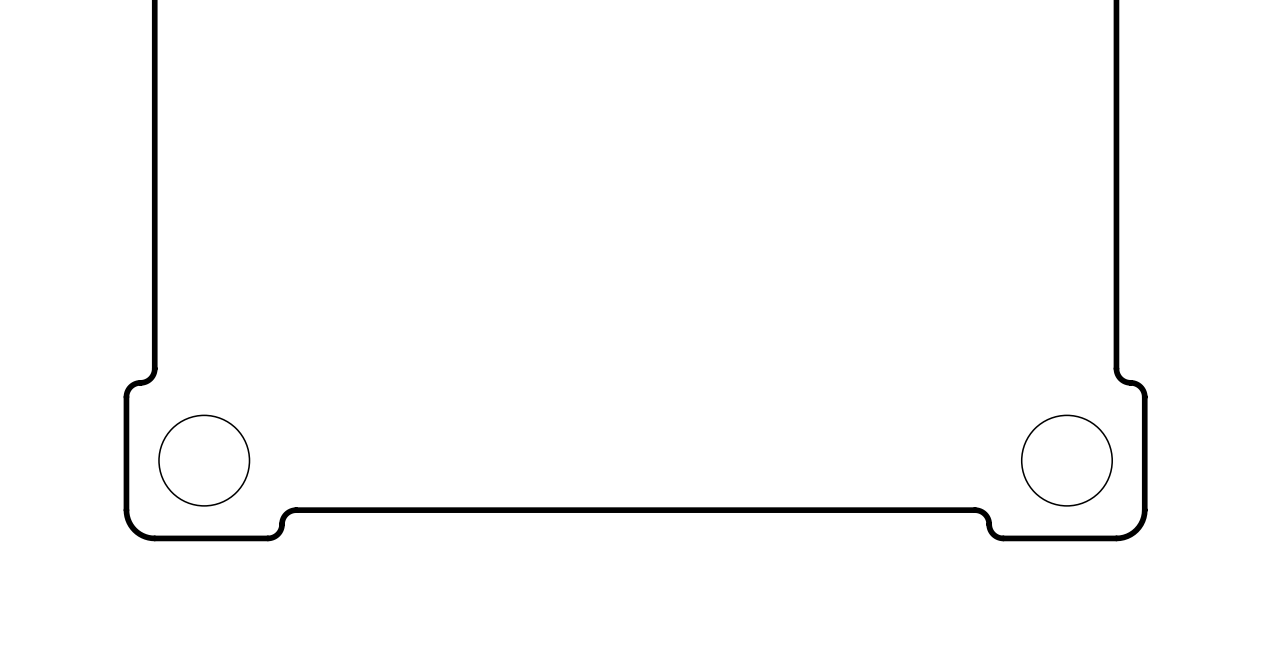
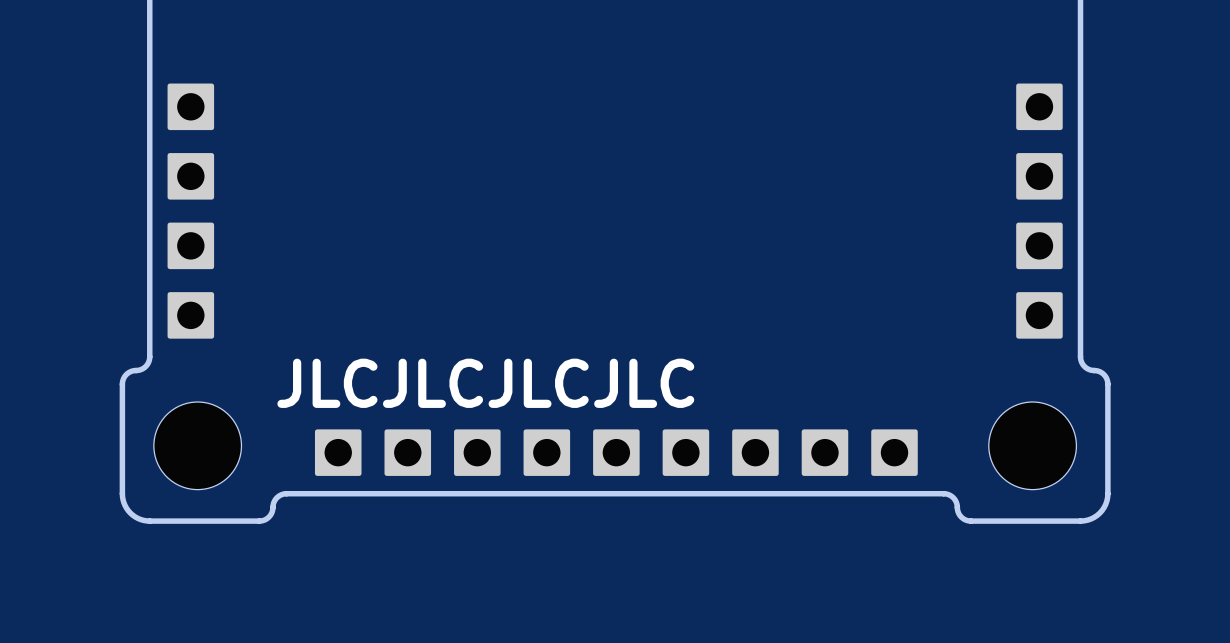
part: none -> (190, 106)
part: none -> (1039, 106)
part: none -> (190, 176)
part: none -> (1039, 176)
part: none -> (190, 245)
part: none -> (1039, 245)
part: none -> (190, 315)
part: none -> (1039, 315)
text: none -> JLCJLCJLCJLC (485, 383)
part: none -> (338, 452)
part: none -> (407, 452)
part: none -> (477, 452)
part: none -> (546, 452)
part: none -> (616, 452)
part: none -> (685, 452)
part: none -> (755, 452)
part: none -> (824, 452)
part: none -> (894, 452)

